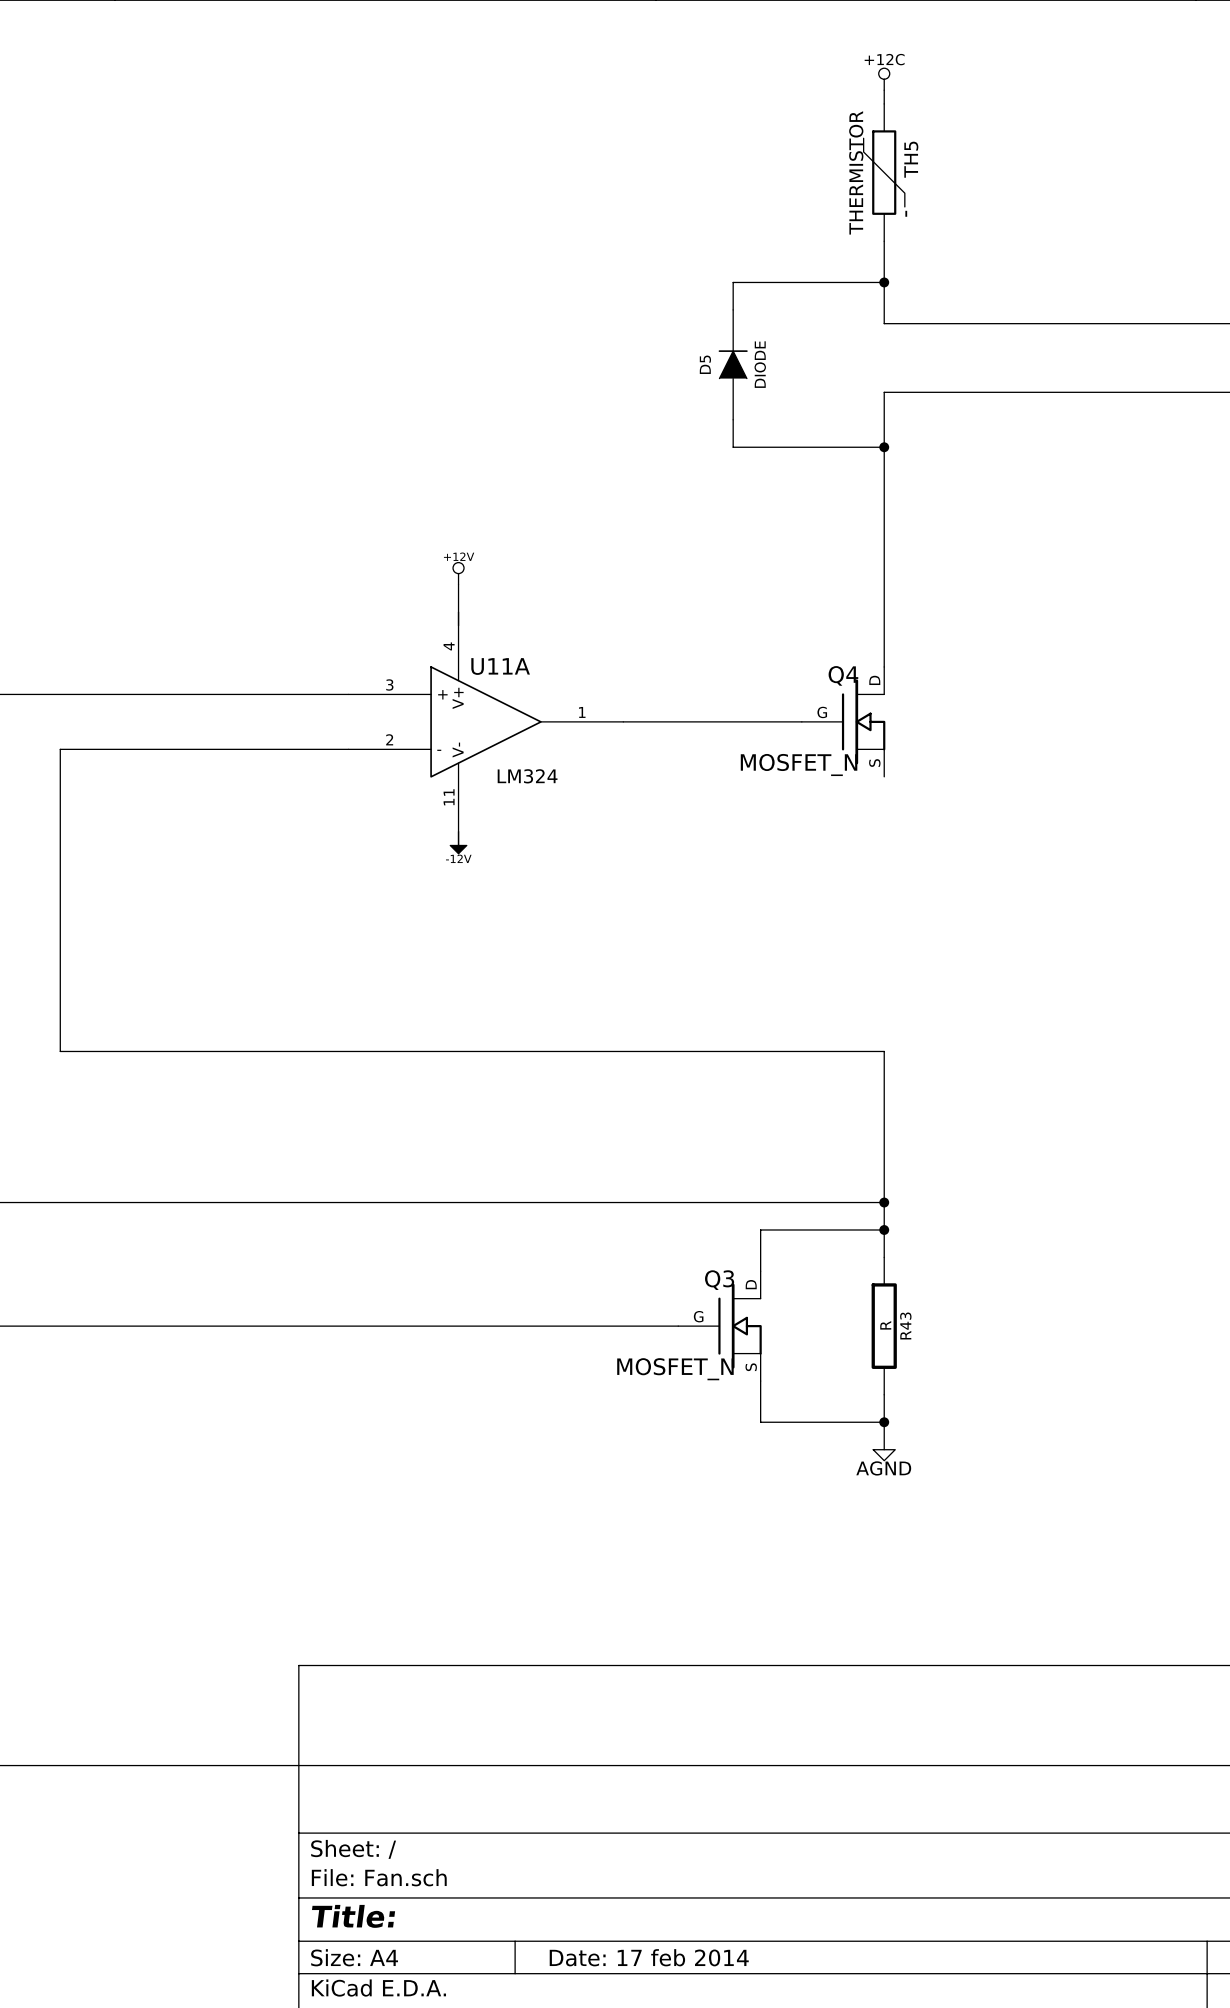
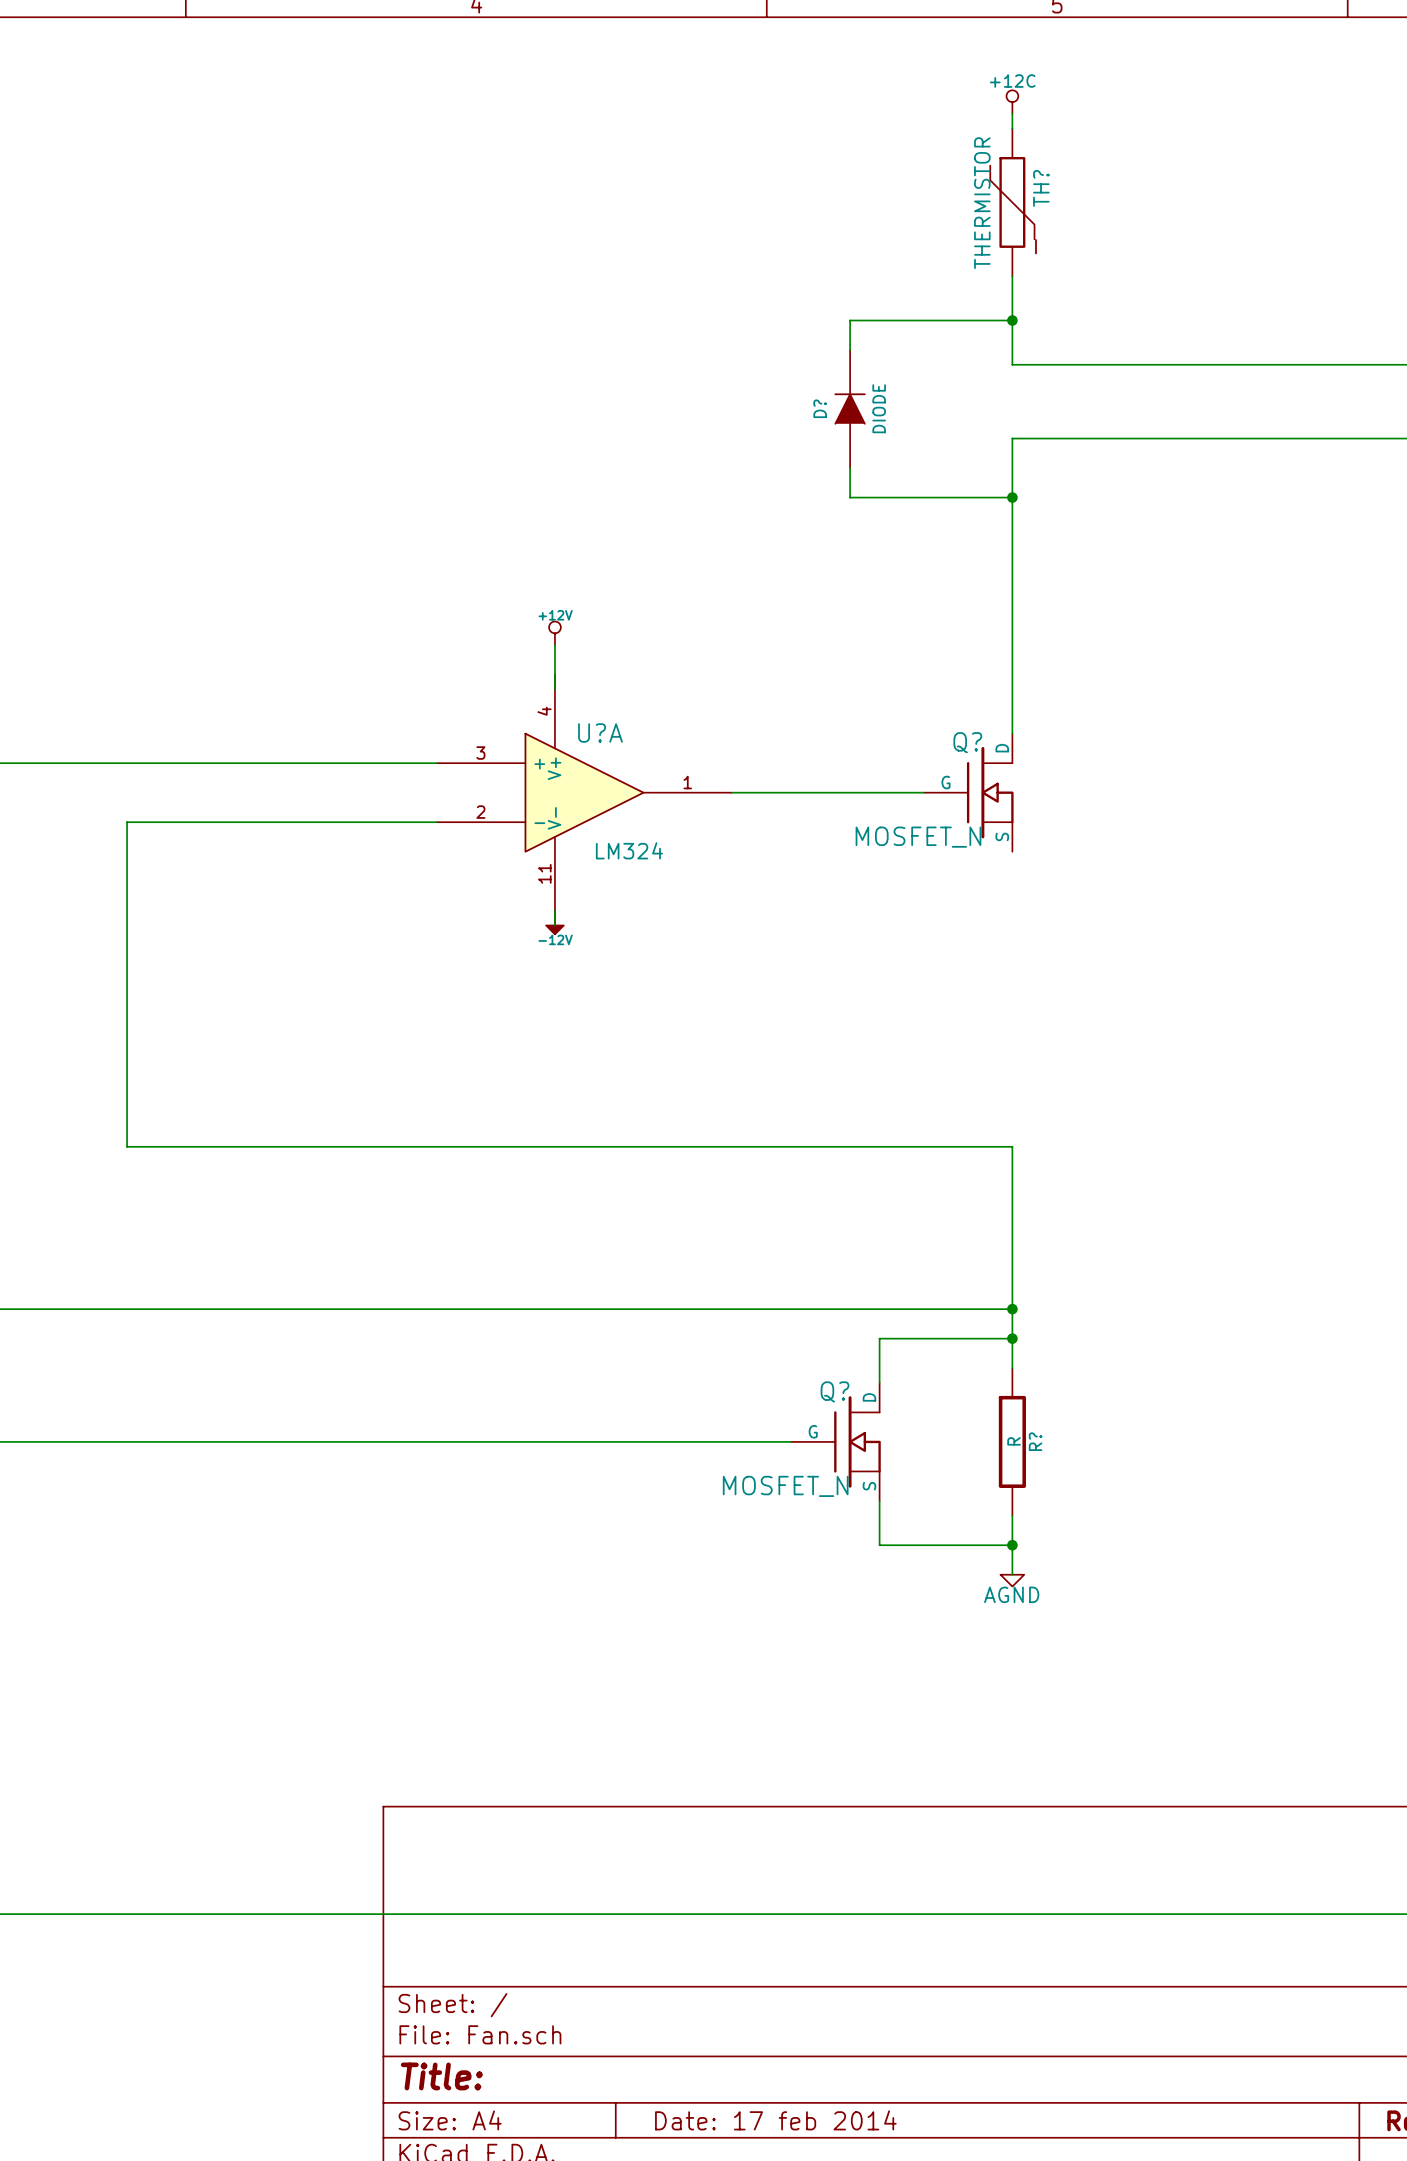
TH5 name: TH5 (911, 159) -> TH? (1041, 188)
D5 name: D5 (705, 364) -> D? (820, 408)
U11A name: U11A (500, 666) -> U?A (600, 733)
Q4 name: Q4 (843, 675) -> Q? (967, 742)
Q3 name: Q3 (719, 1280) -> Q? (835, 1391)
R43 name: R43 (905, 1325) -> R? (1035, 1441)

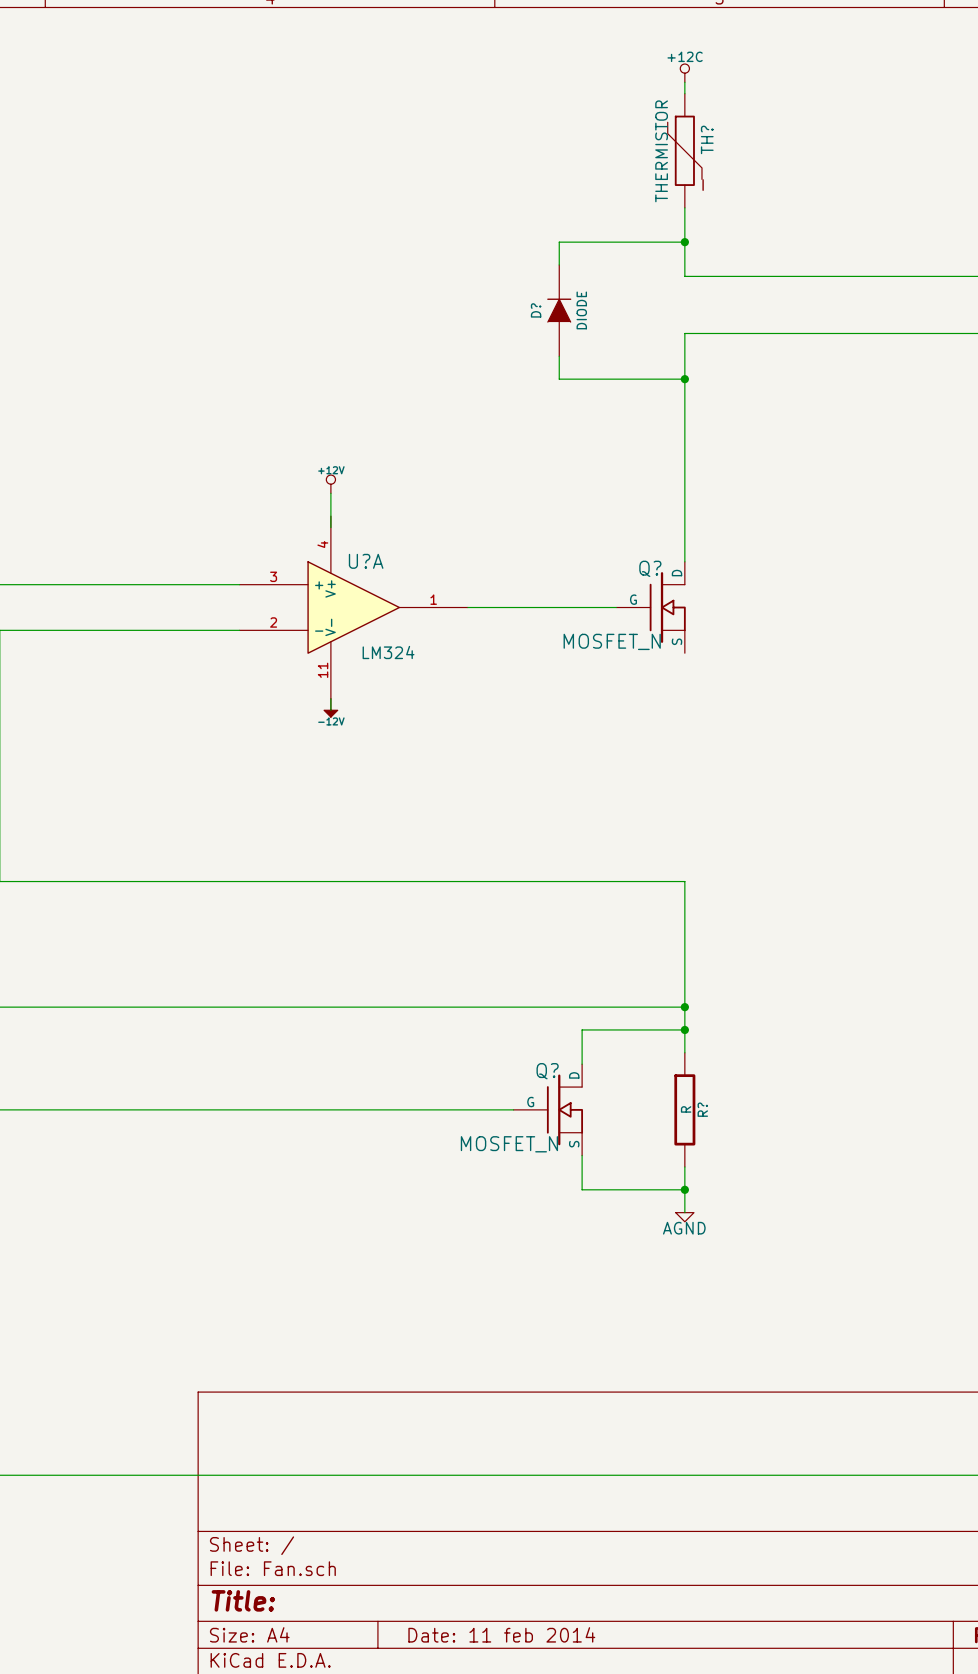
title block: Date: 17 feb 2014 (775, 2120) -> Date: 11 feb 2014 (501, 1634)

